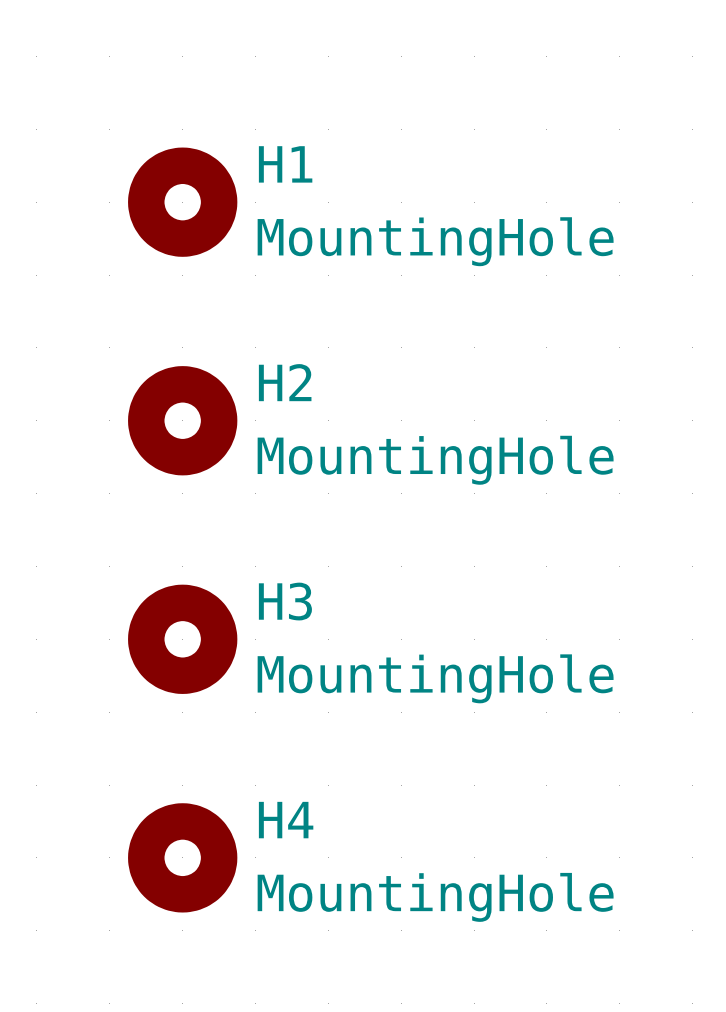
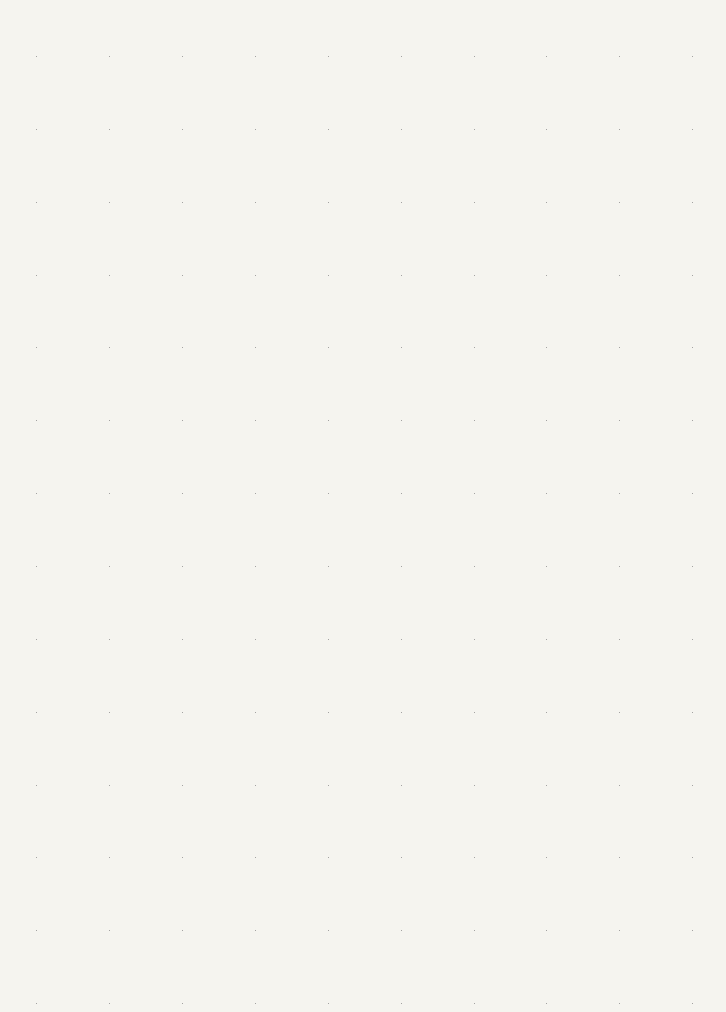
H1: MountingHole (182, 202) -> none
H2: MountingHole (182, 420) -> none
H3: MountingHole (182, 639) -> none
H4: MountingHole (182, 857) -> none

